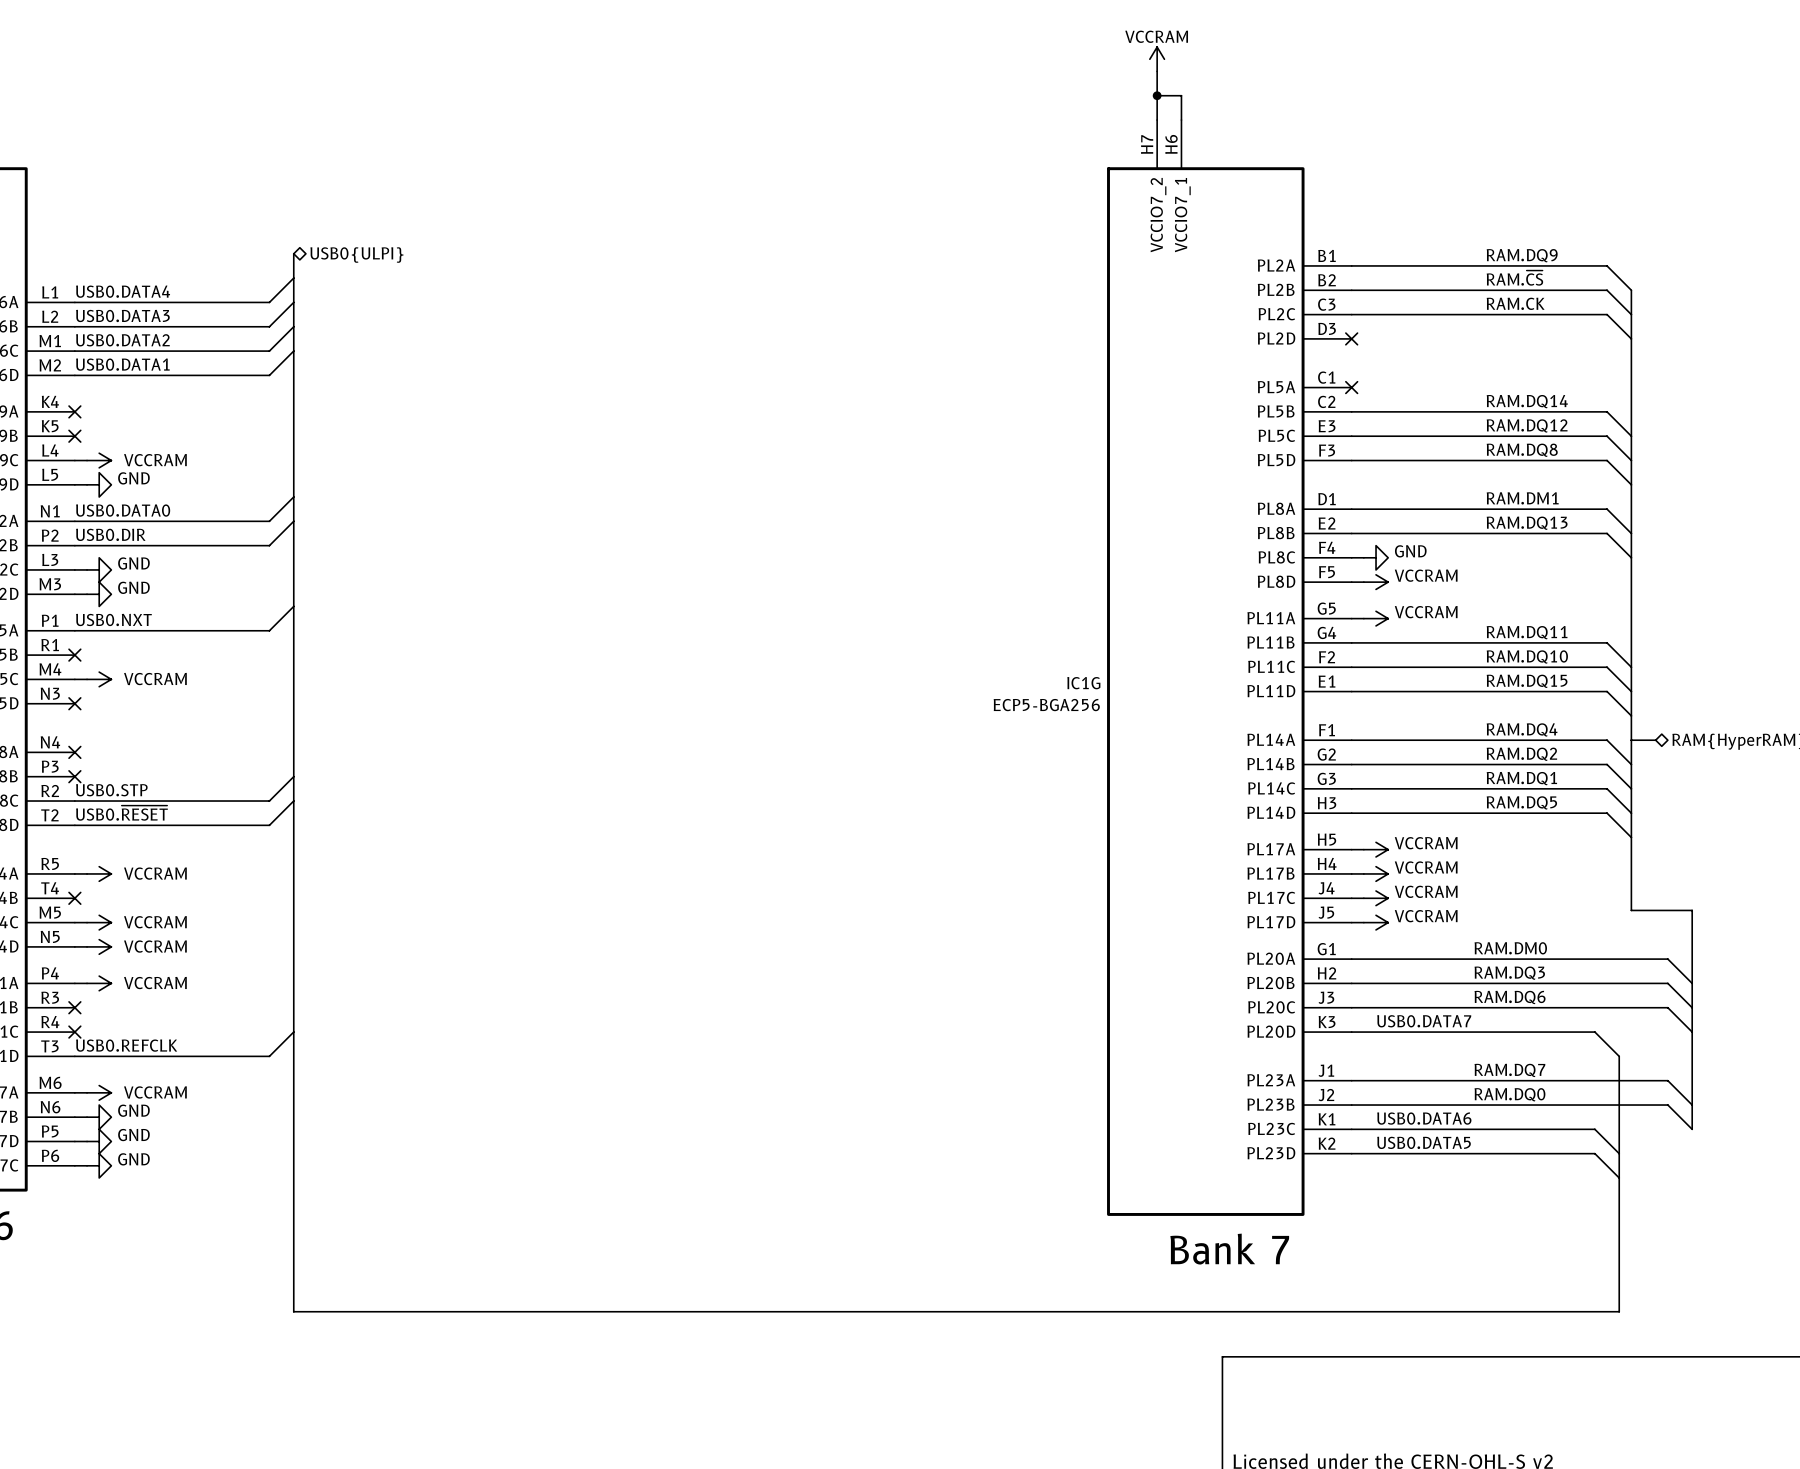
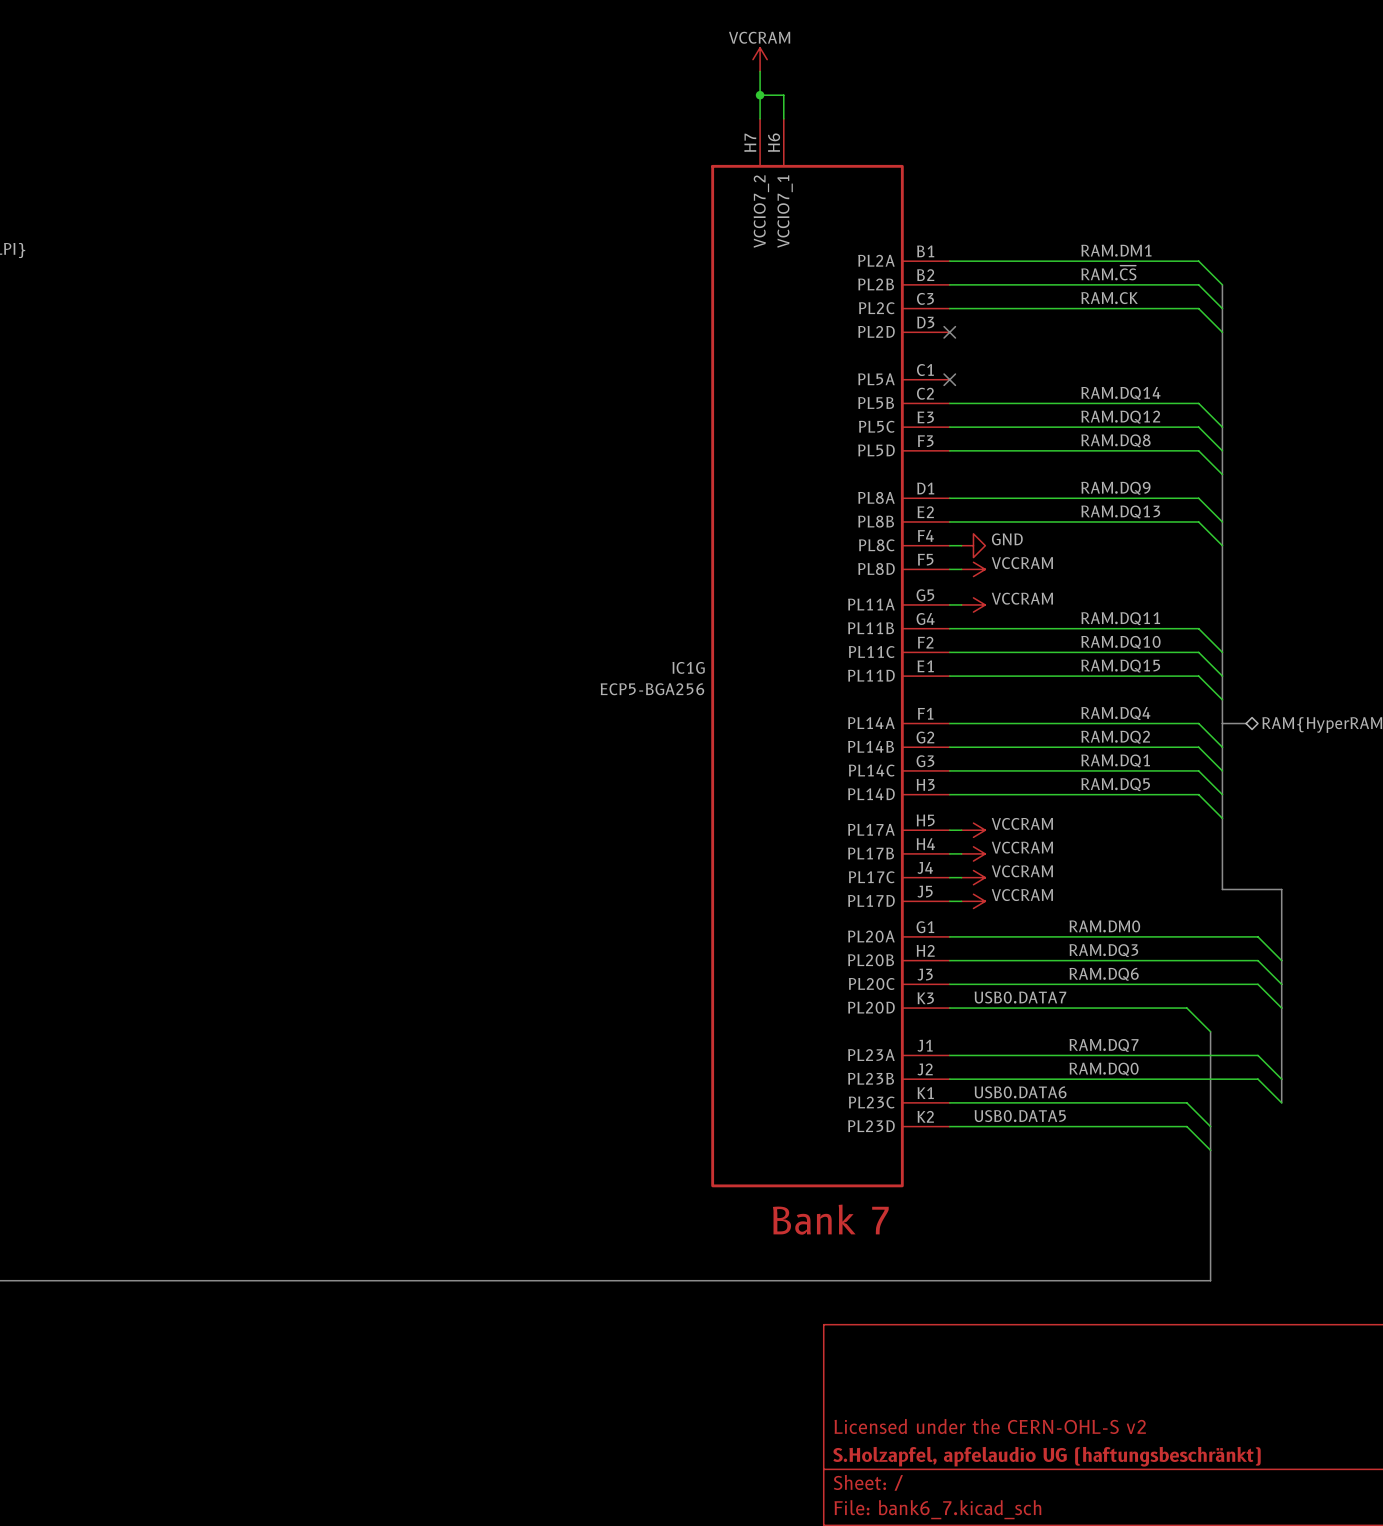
label: RAM.DQ9 (1522, 255) -> RAM.DM1 (1116, 250)
label: RAM.DM1 (1522, 498) -> RAM.DQ9 (1115, 488)

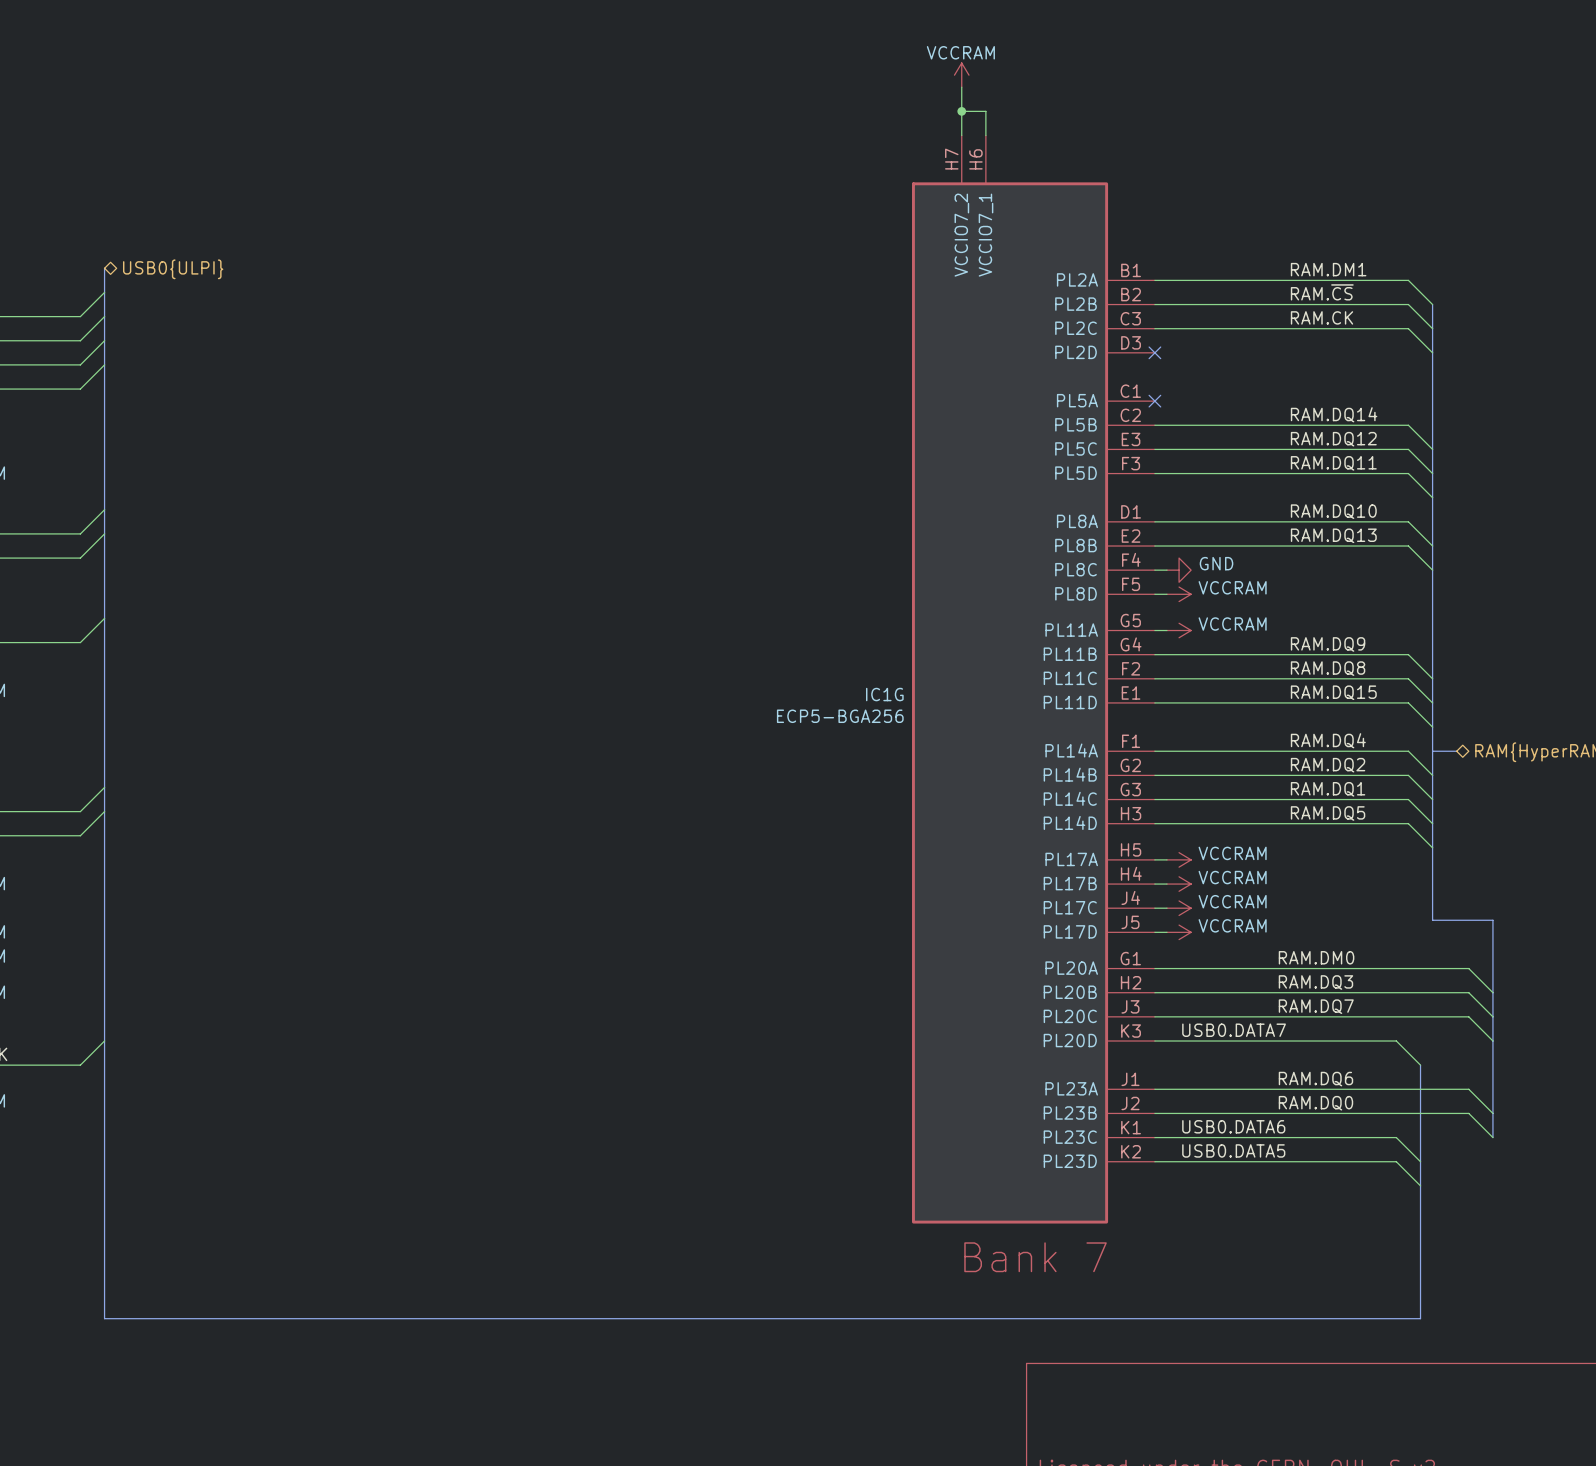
label: RAM.DQ8 (1115, 440) -> RAM.DQ11 (1333, 463)
label: RAM.DQ9 (1115, 488) -> RAM.DQ10 (1333, 511)
label: RAM.DQ11 (1120, 618) -> RAM.DQ9 (1328, 644)
label: RAM.DQ10 (1120, 642) -> RAM.DQ8 (1328, 668)
label: RAM.DQ6 (1104, 974) -> RAM.DQ7 (1316, 1006)
label: RAM.DQ7 (1104, 1045) -> RAM.DQ6 (1315, 1079)

